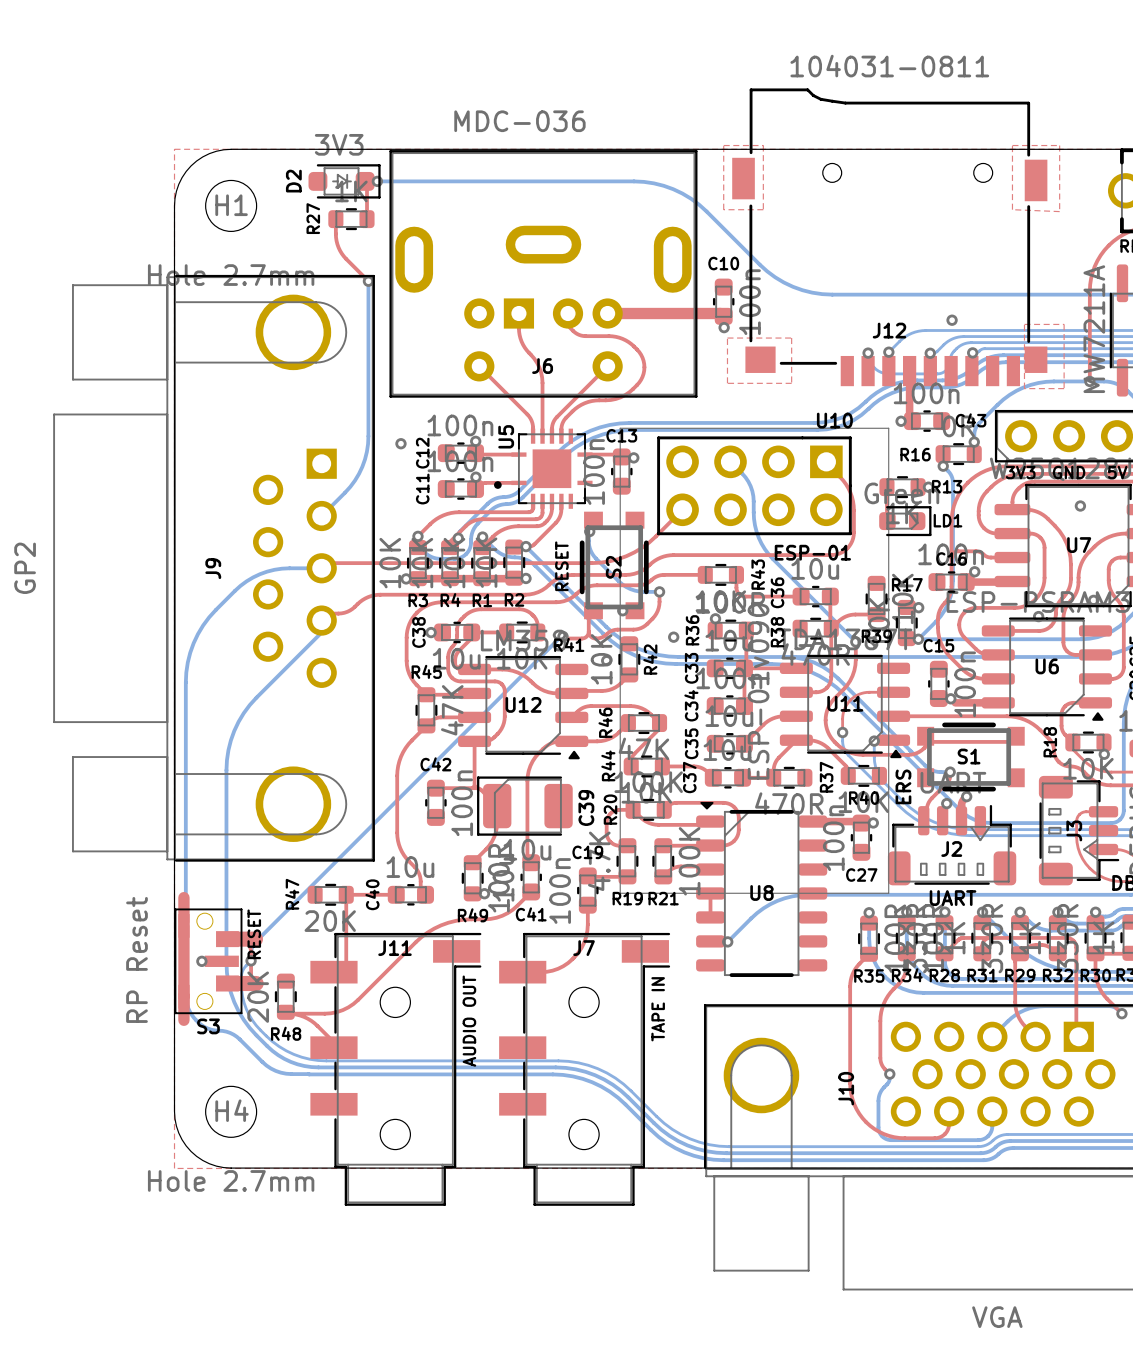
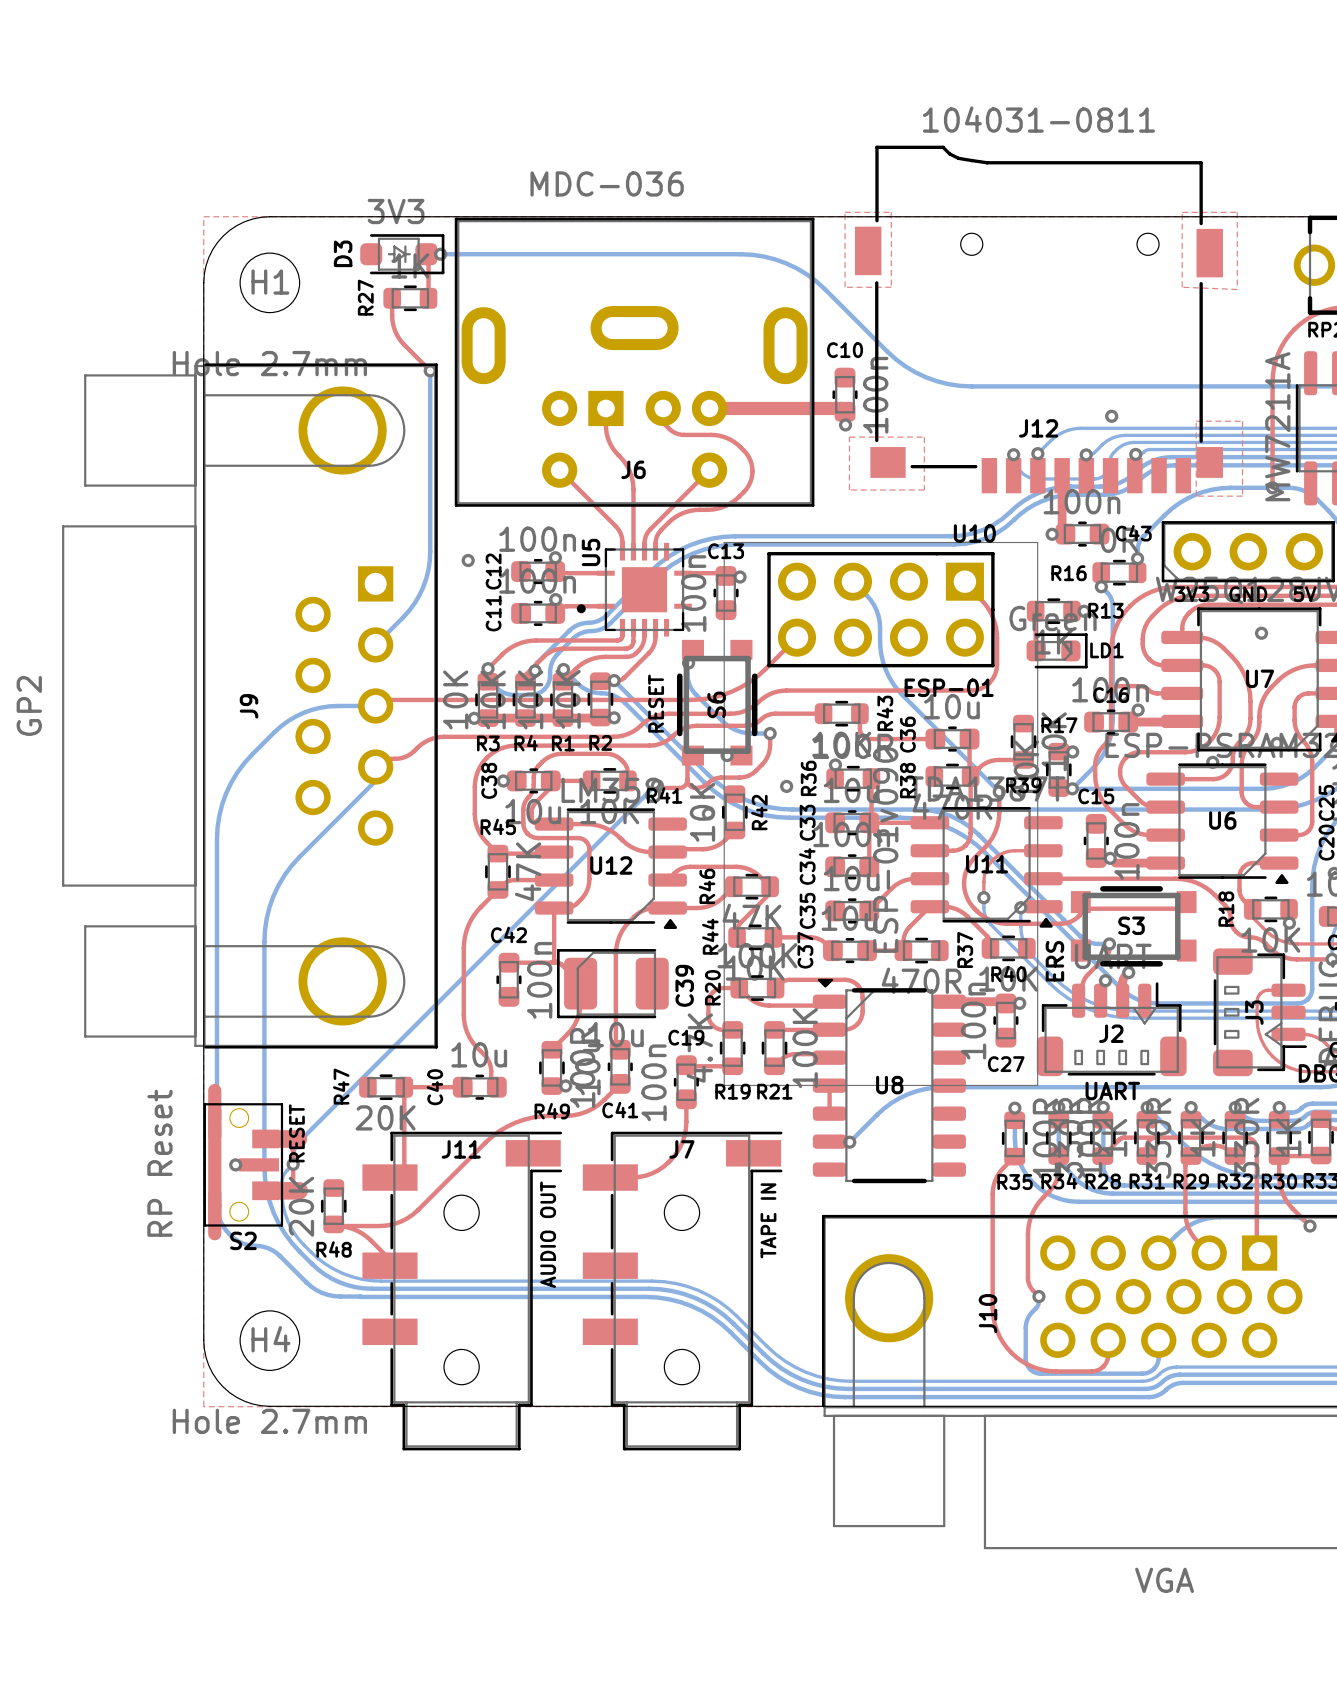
D2 name: D2 (293, 181) -> D3 (343, 253)
S2 name: S2 (613, 567) -> S6 (716, 704)
S1 name: S1 (969, 756) -> S3 (1131, 925)
S3 name: S3 (208, 1026) -> S2 (243, 1240)

